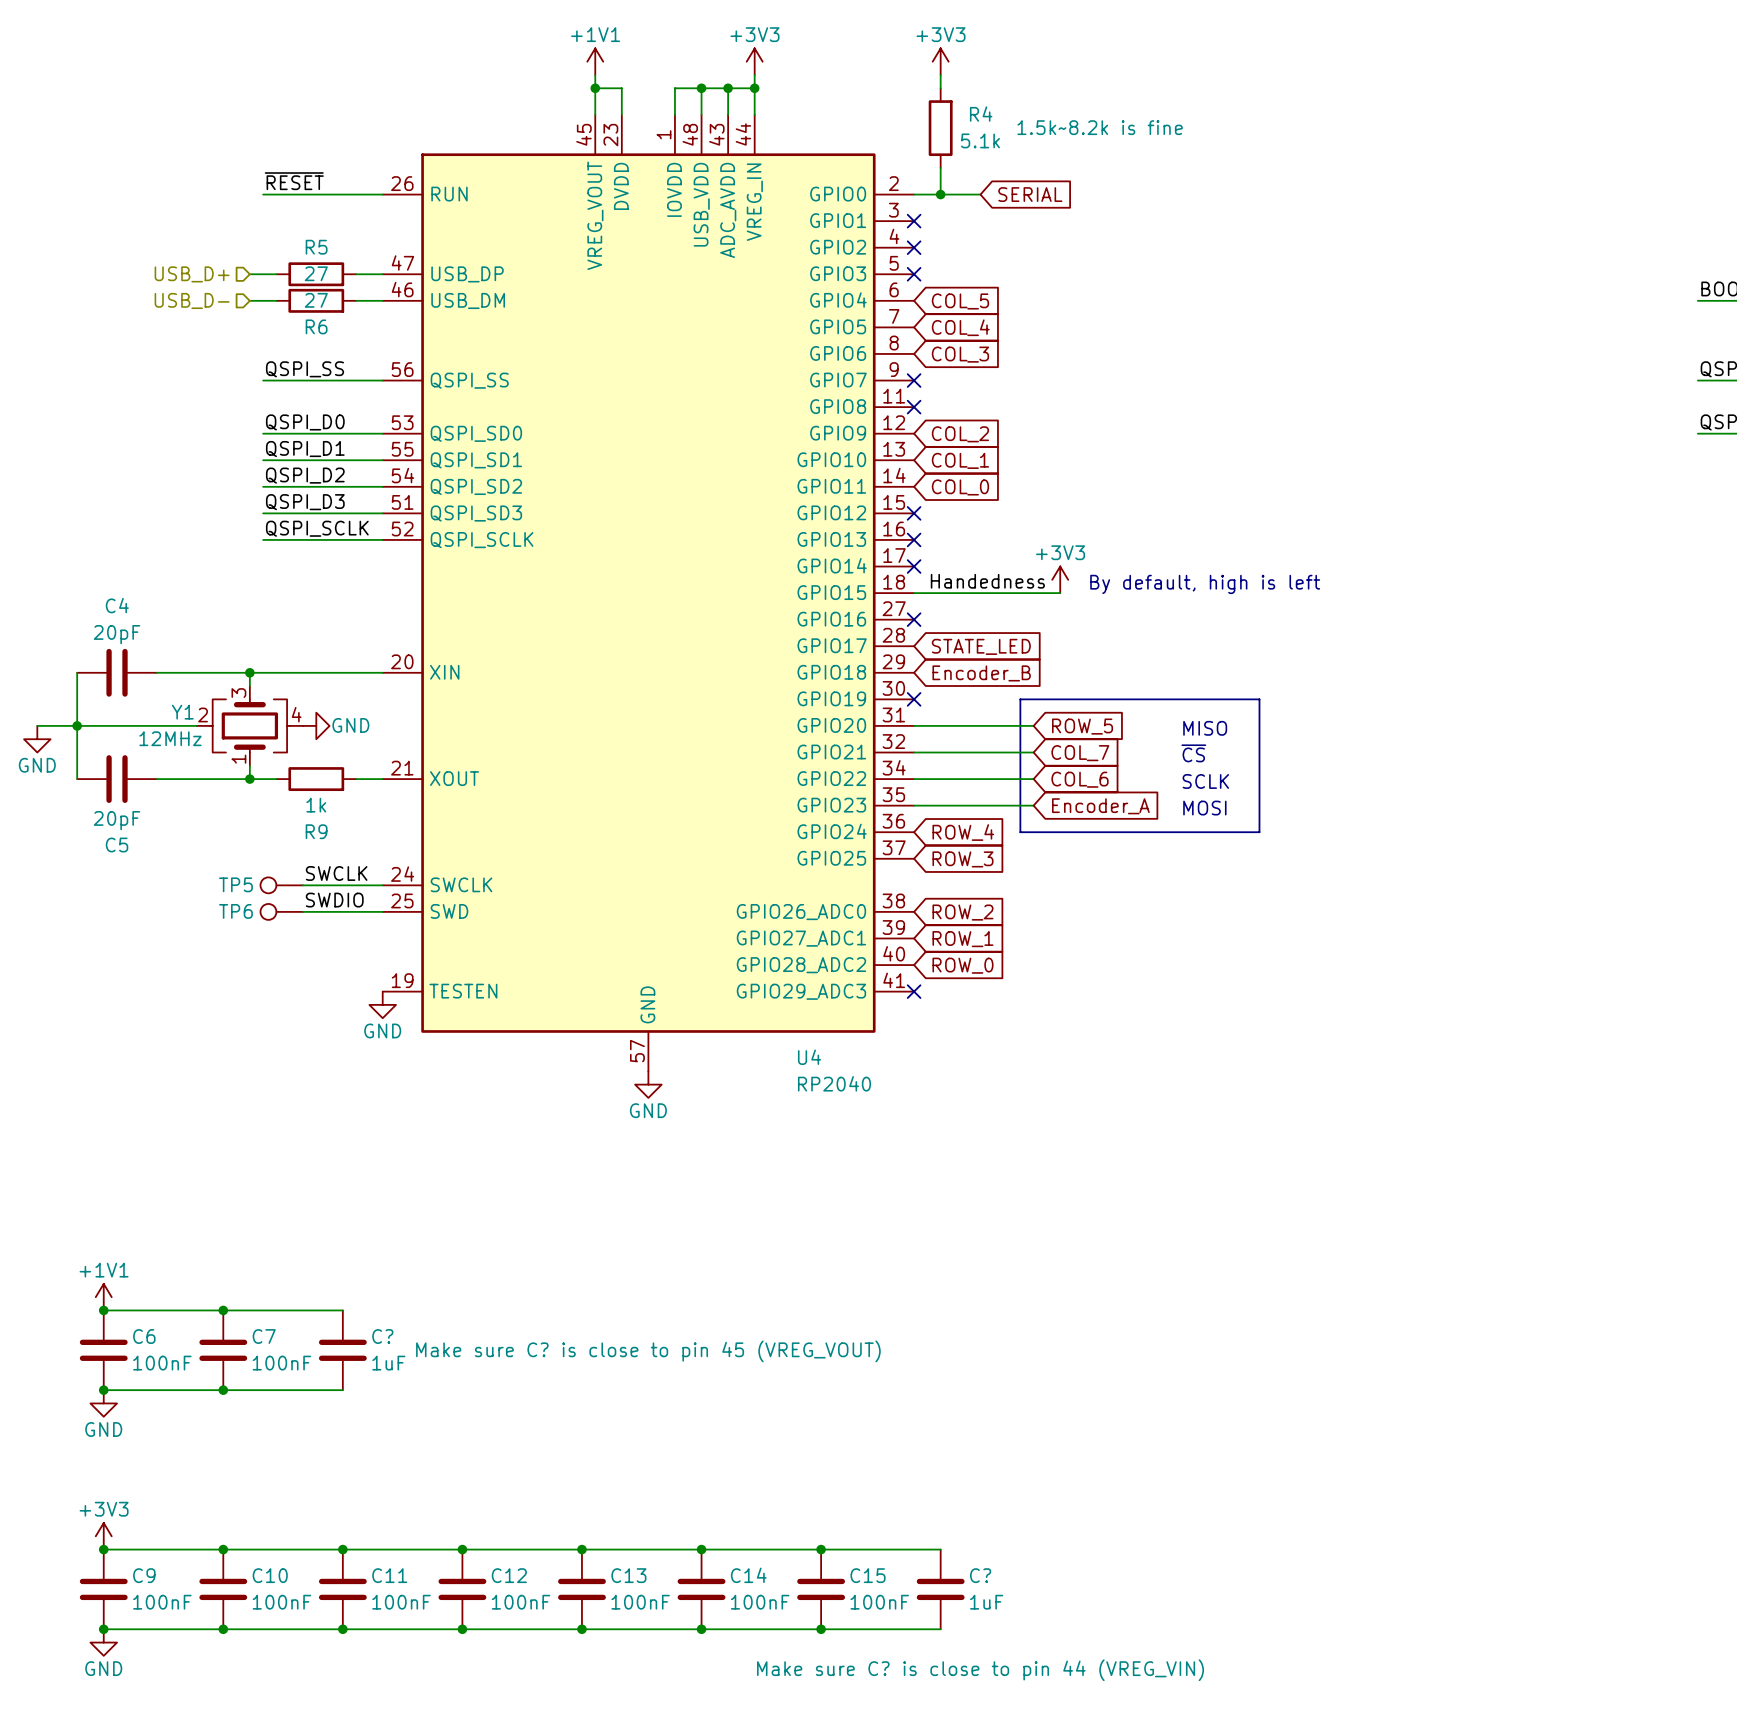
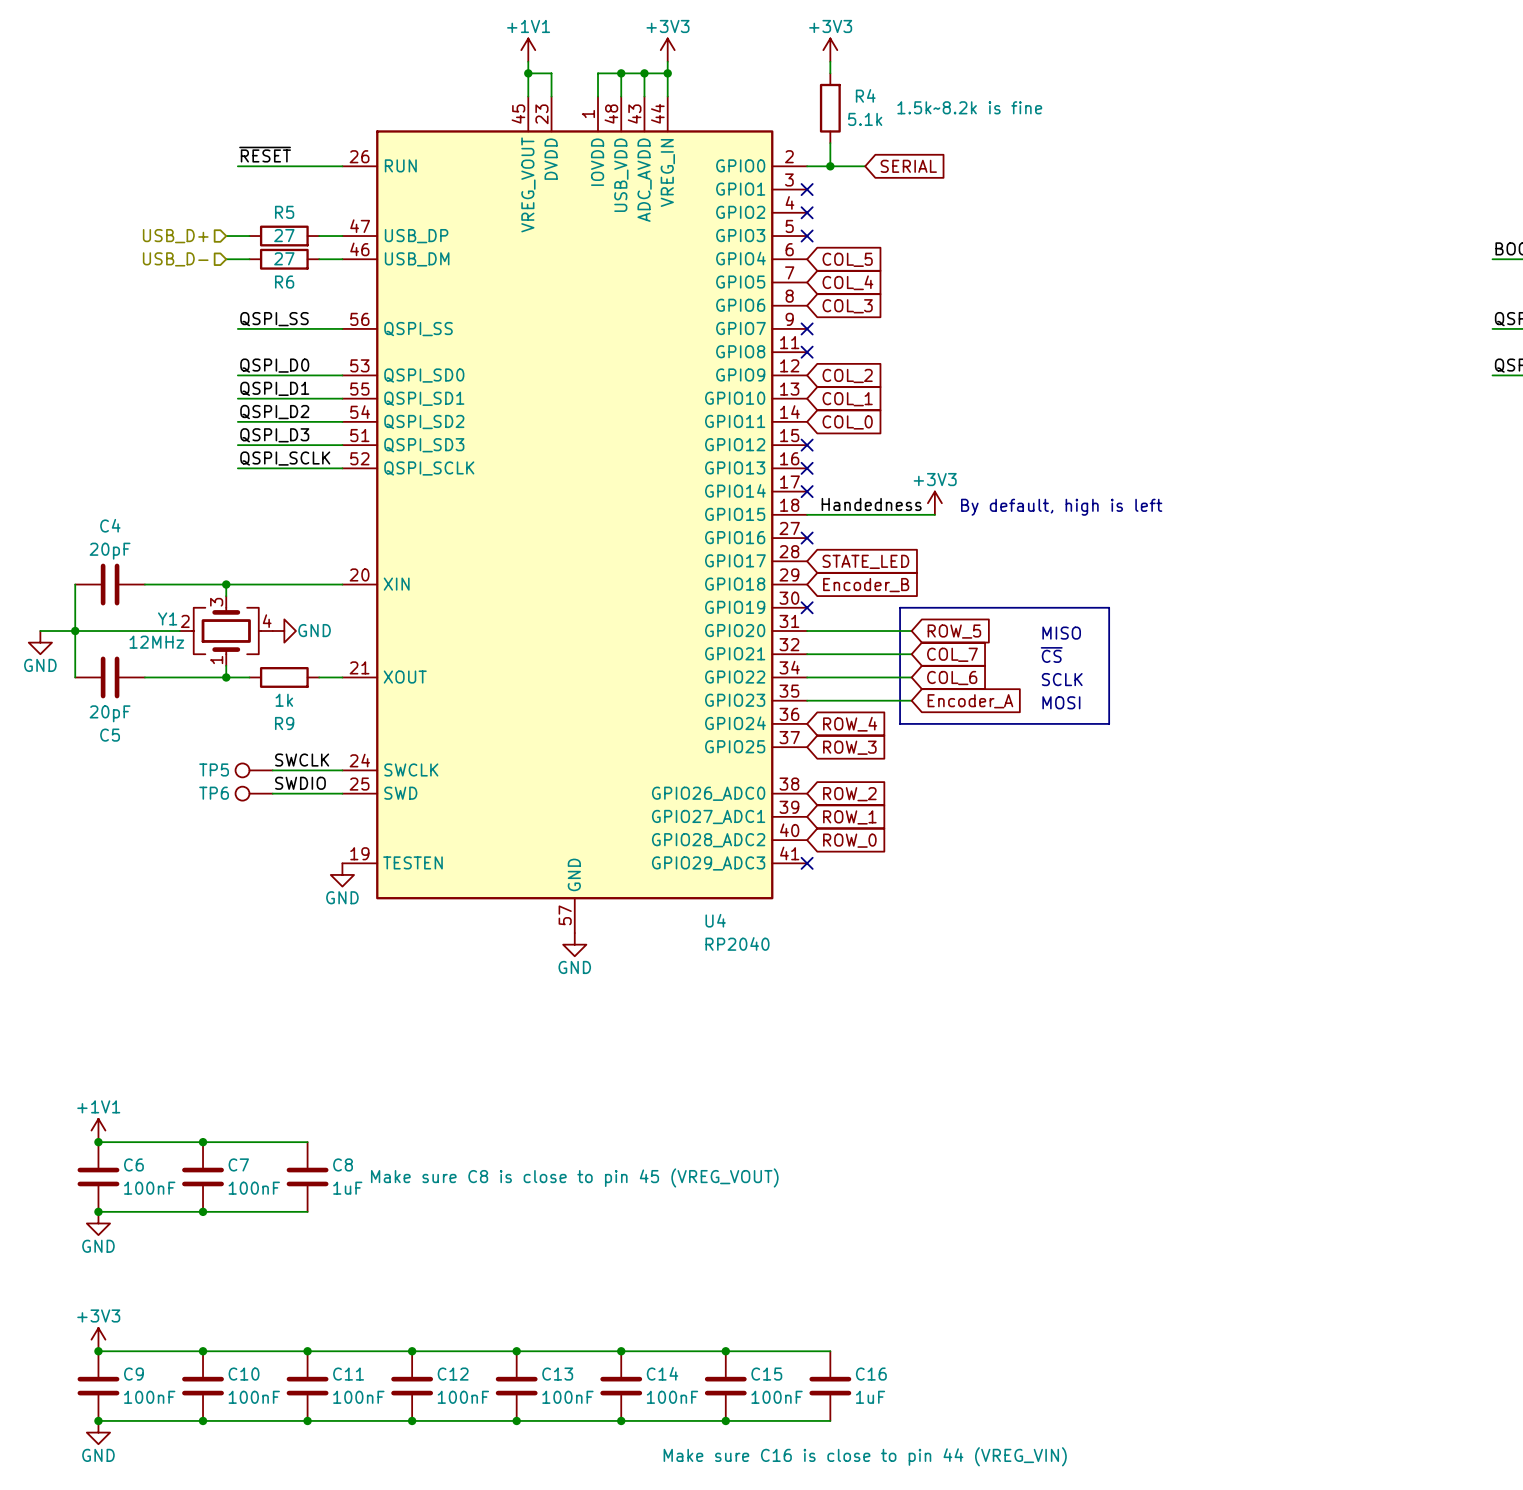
C? name: C? (382, 1336) -> C8 (343, 1164)
C? text: Make sure C? is close to pin 45 (VREG_VOUT) (648, 1351) -> Make sure C8 is close to pin 45 (VREG_VOUT) (574, 1177)
C? name: C? (980, 1575) -> C16 (871, 1374)
C? text: Make sure C? is close to pin 44 (VREG_VIN) (980, 1670) -> Make sure C16 is close to pin 44 (VREG_VIN) (865, 1456)

